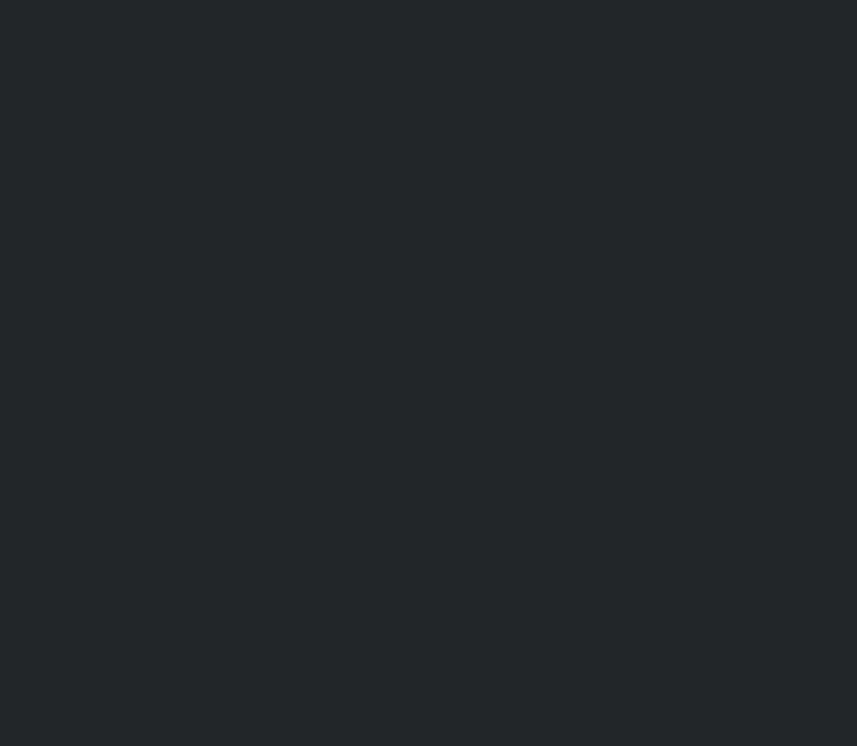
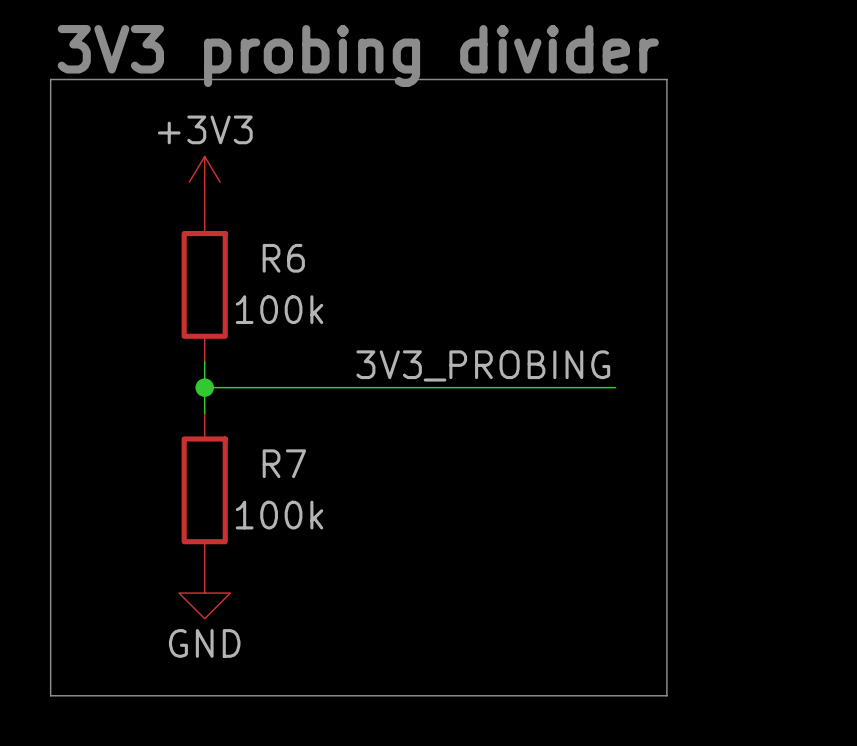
text: none -> 3V3 probing divider (358, 56)
line: none -> (50, 79) (666, 79) (666, 695) (50, 695) (50, 79)
power symbol: none -> +3V3 (204, 182)
R6: none -> 100k (204, 284)
wire: none -> (204, 361) (204, 413)
label: none -> 3V3_PROBING (483, 365)
wire: none -> (204, 387) (615, 387)
junction: none -> (204, 387)
R7: none -> 100k (204, 490)
power symbol: none -> GND (204, 593)

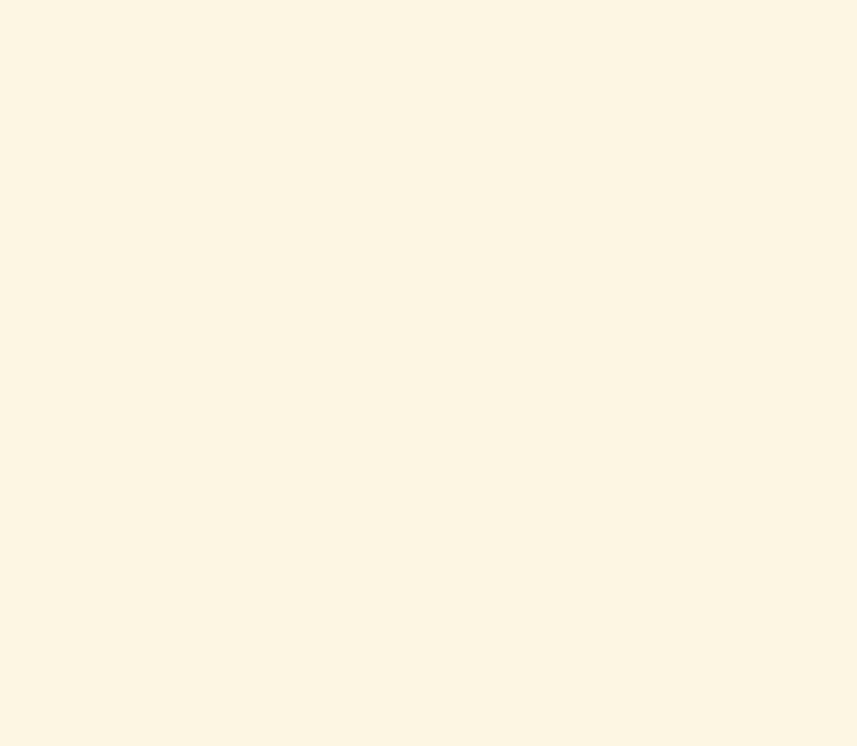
text: 3V3 probing divider (358, 56) -> none
line: (50, 79) (666, 79) (666, 695) (50, 695) (50, 79) -> none
power symbol: +3V3 (204, 182) -> none
R6: 100k (204, 284) -> none
wire: (204, 361) (204, 413) -> none
label: 3V3_PROBING (483, 365) -> none
wire: (204, 387) (615, 387) -> none
junction: (204, 387) -> none
R7: 100k (204, 490) -> none
power symbol: GND (204, 593) -> none

